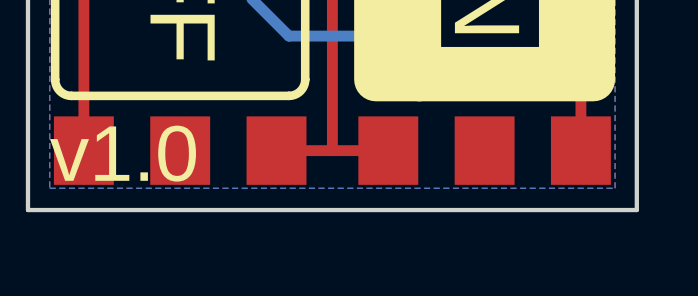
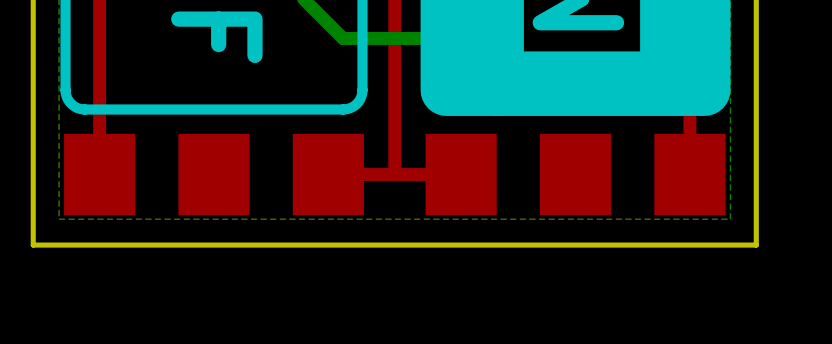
text: v1.0 (123, 153) -> none

